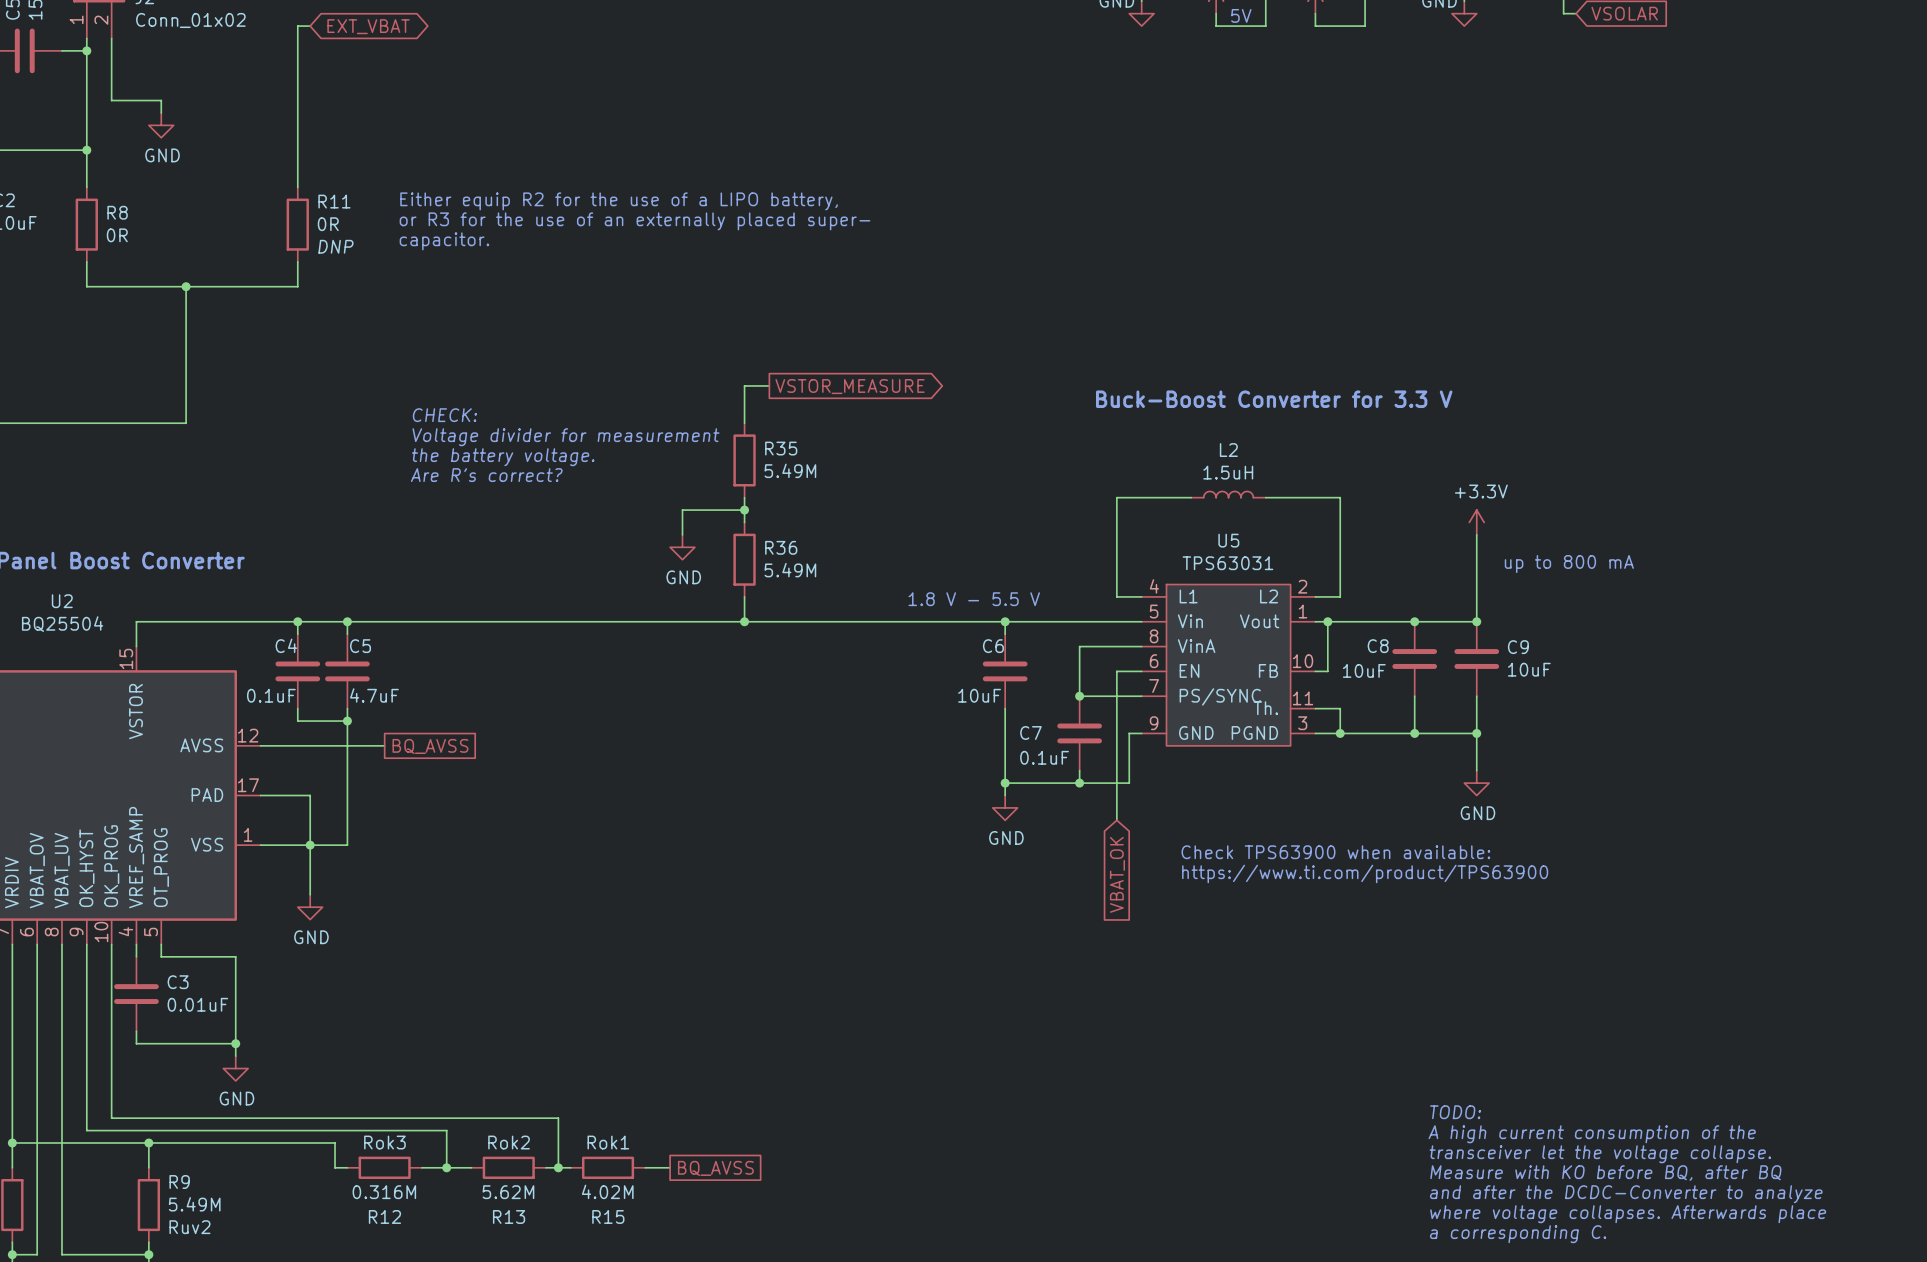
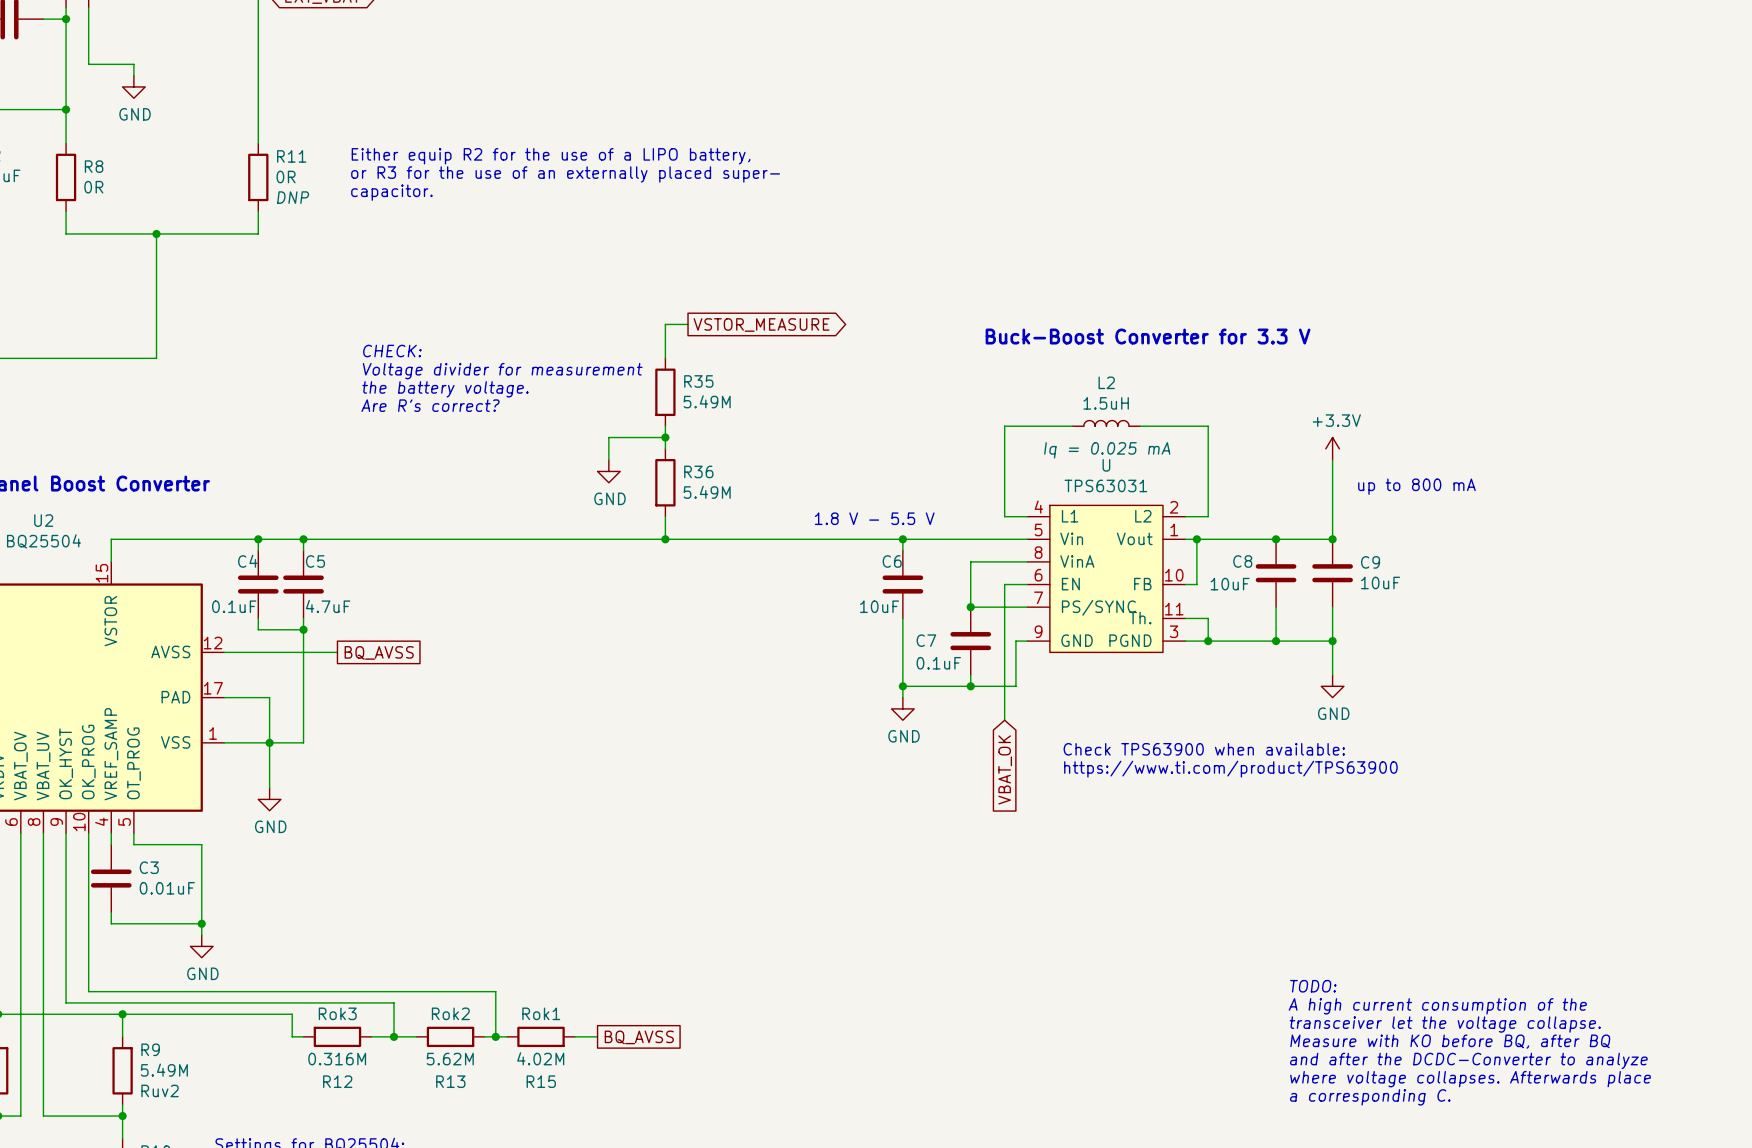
U5 text: none -> Iq = 0.025 mA (1107, 450)
U5 name: U5 (1228, 540) -> U (1106, 465)

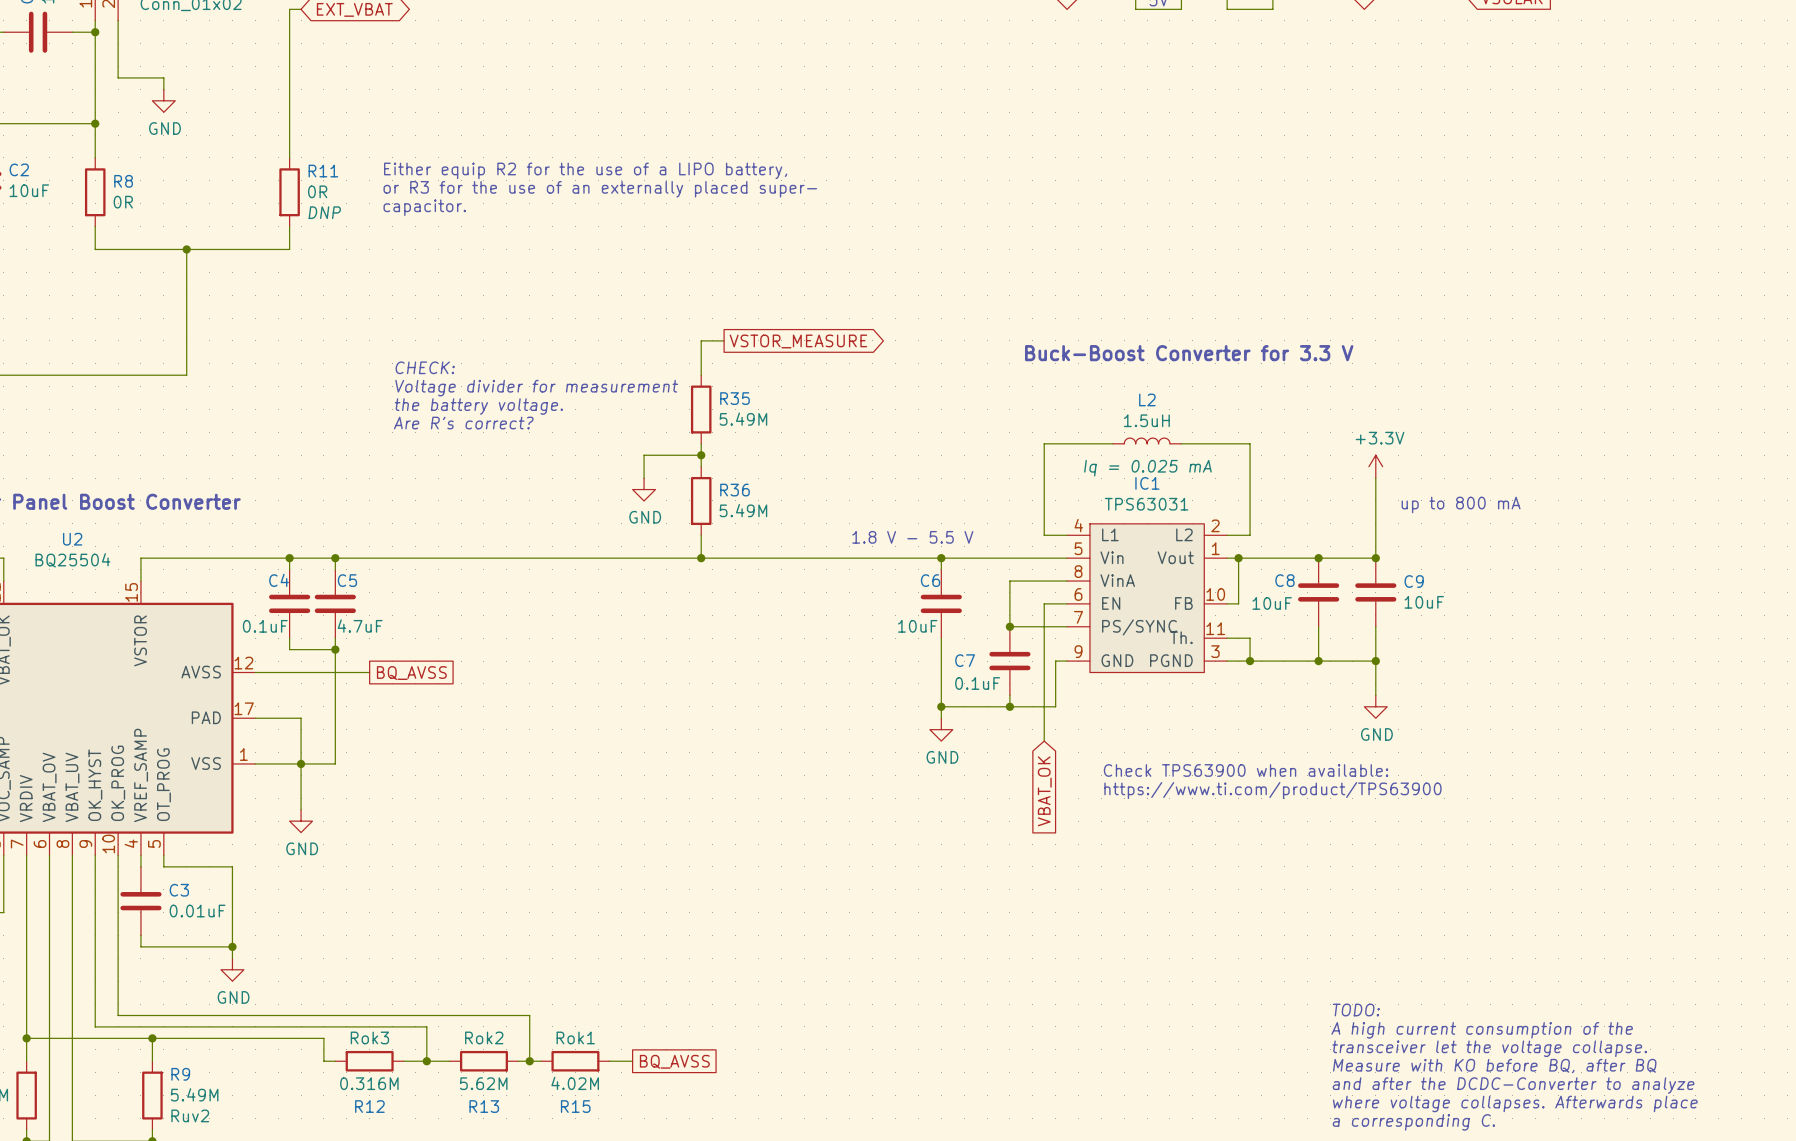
U name: U (1106, 465) -> IC1 (1147, 483)

